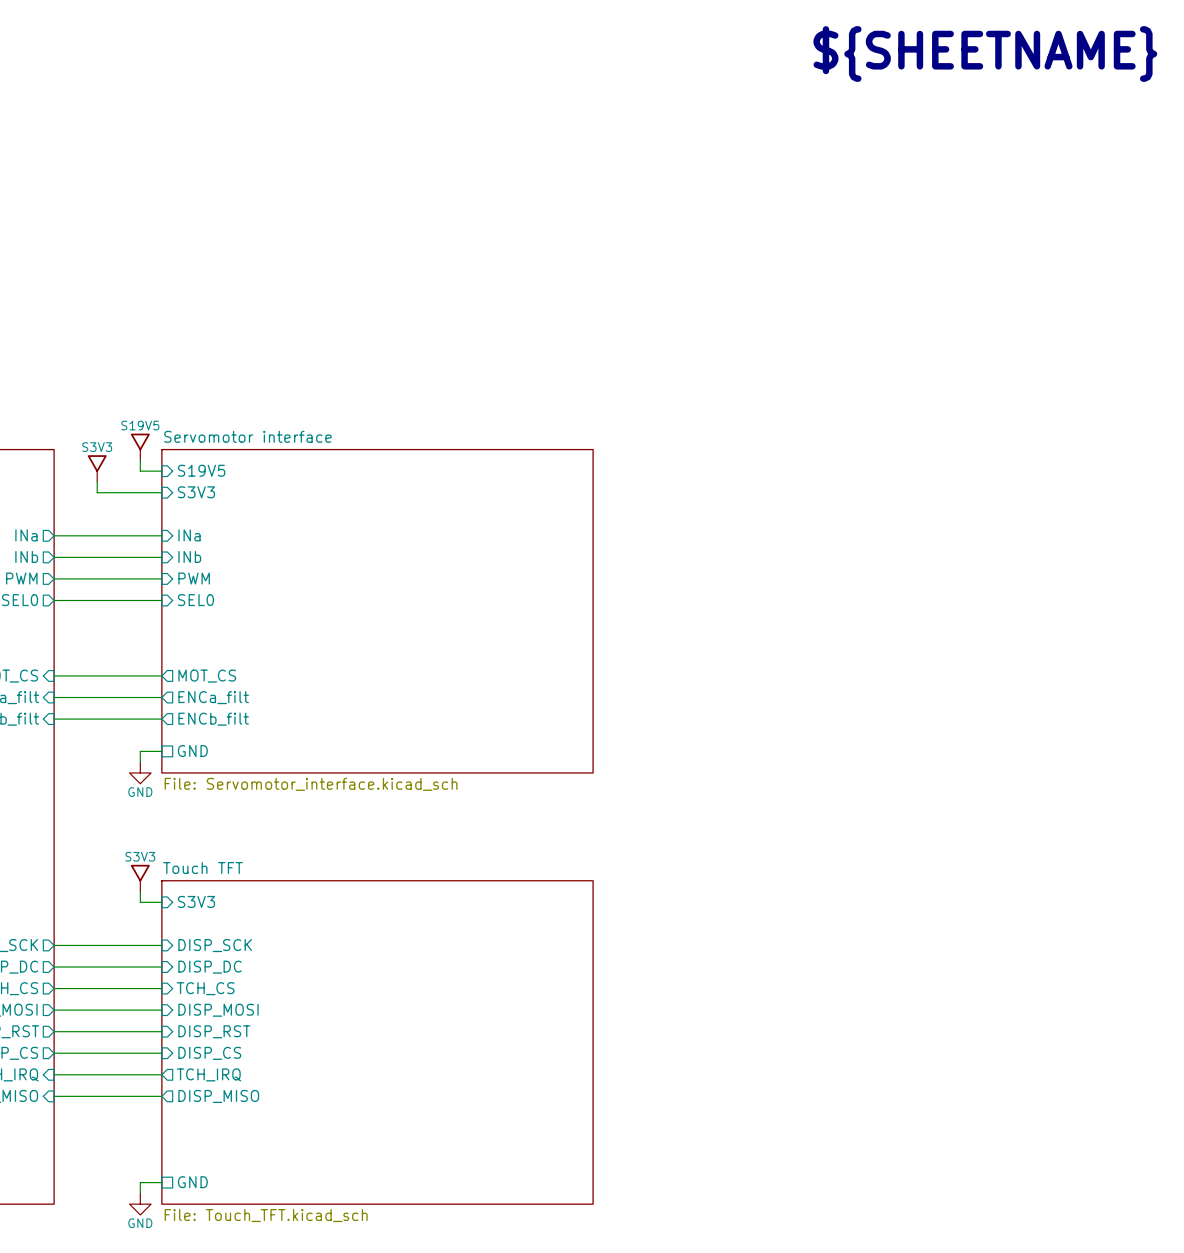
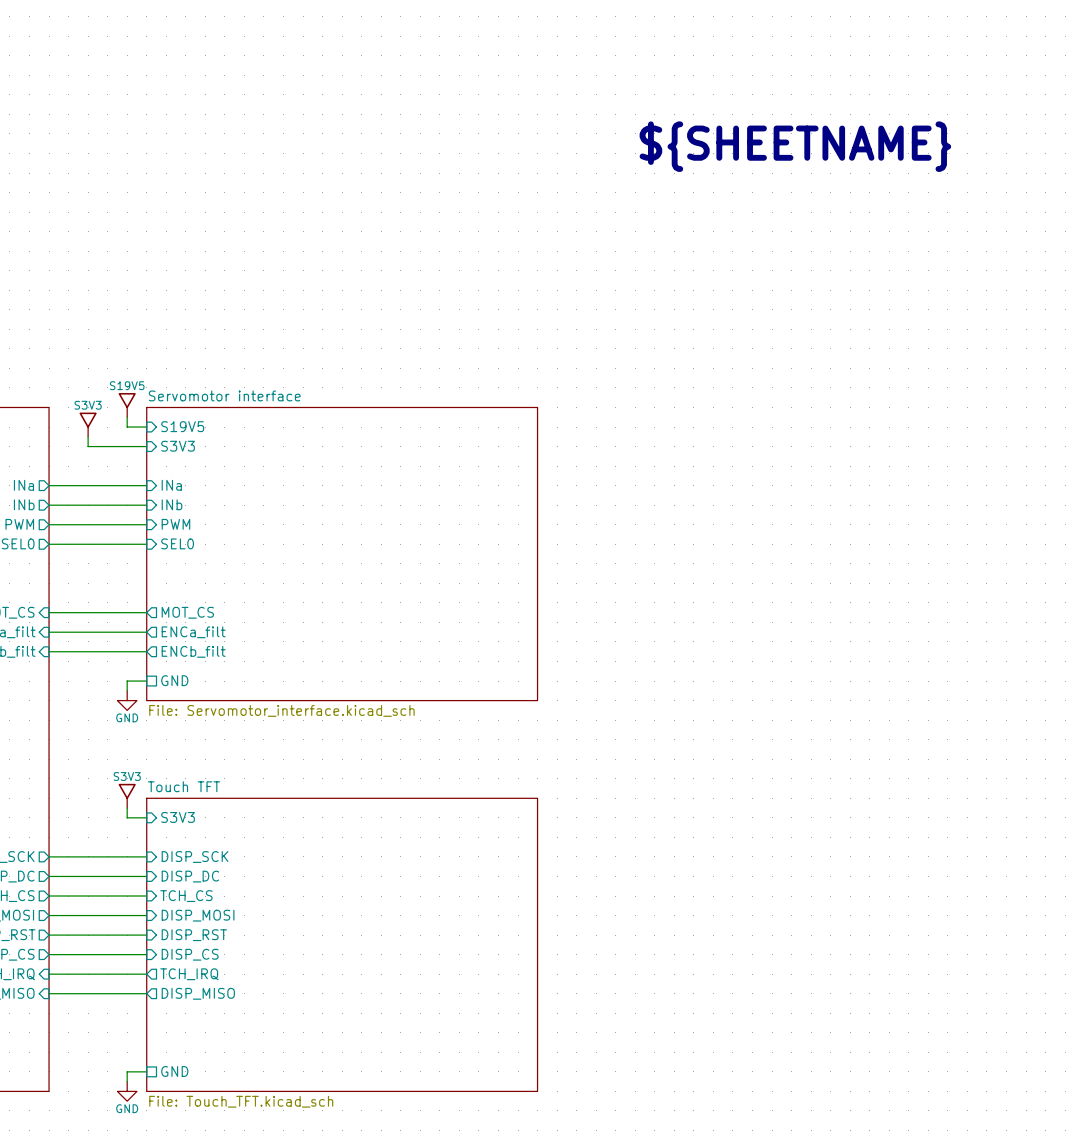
text position: ${SHEETNAME} (985, 54) -> ${SHEETNAME} (795, 146)

